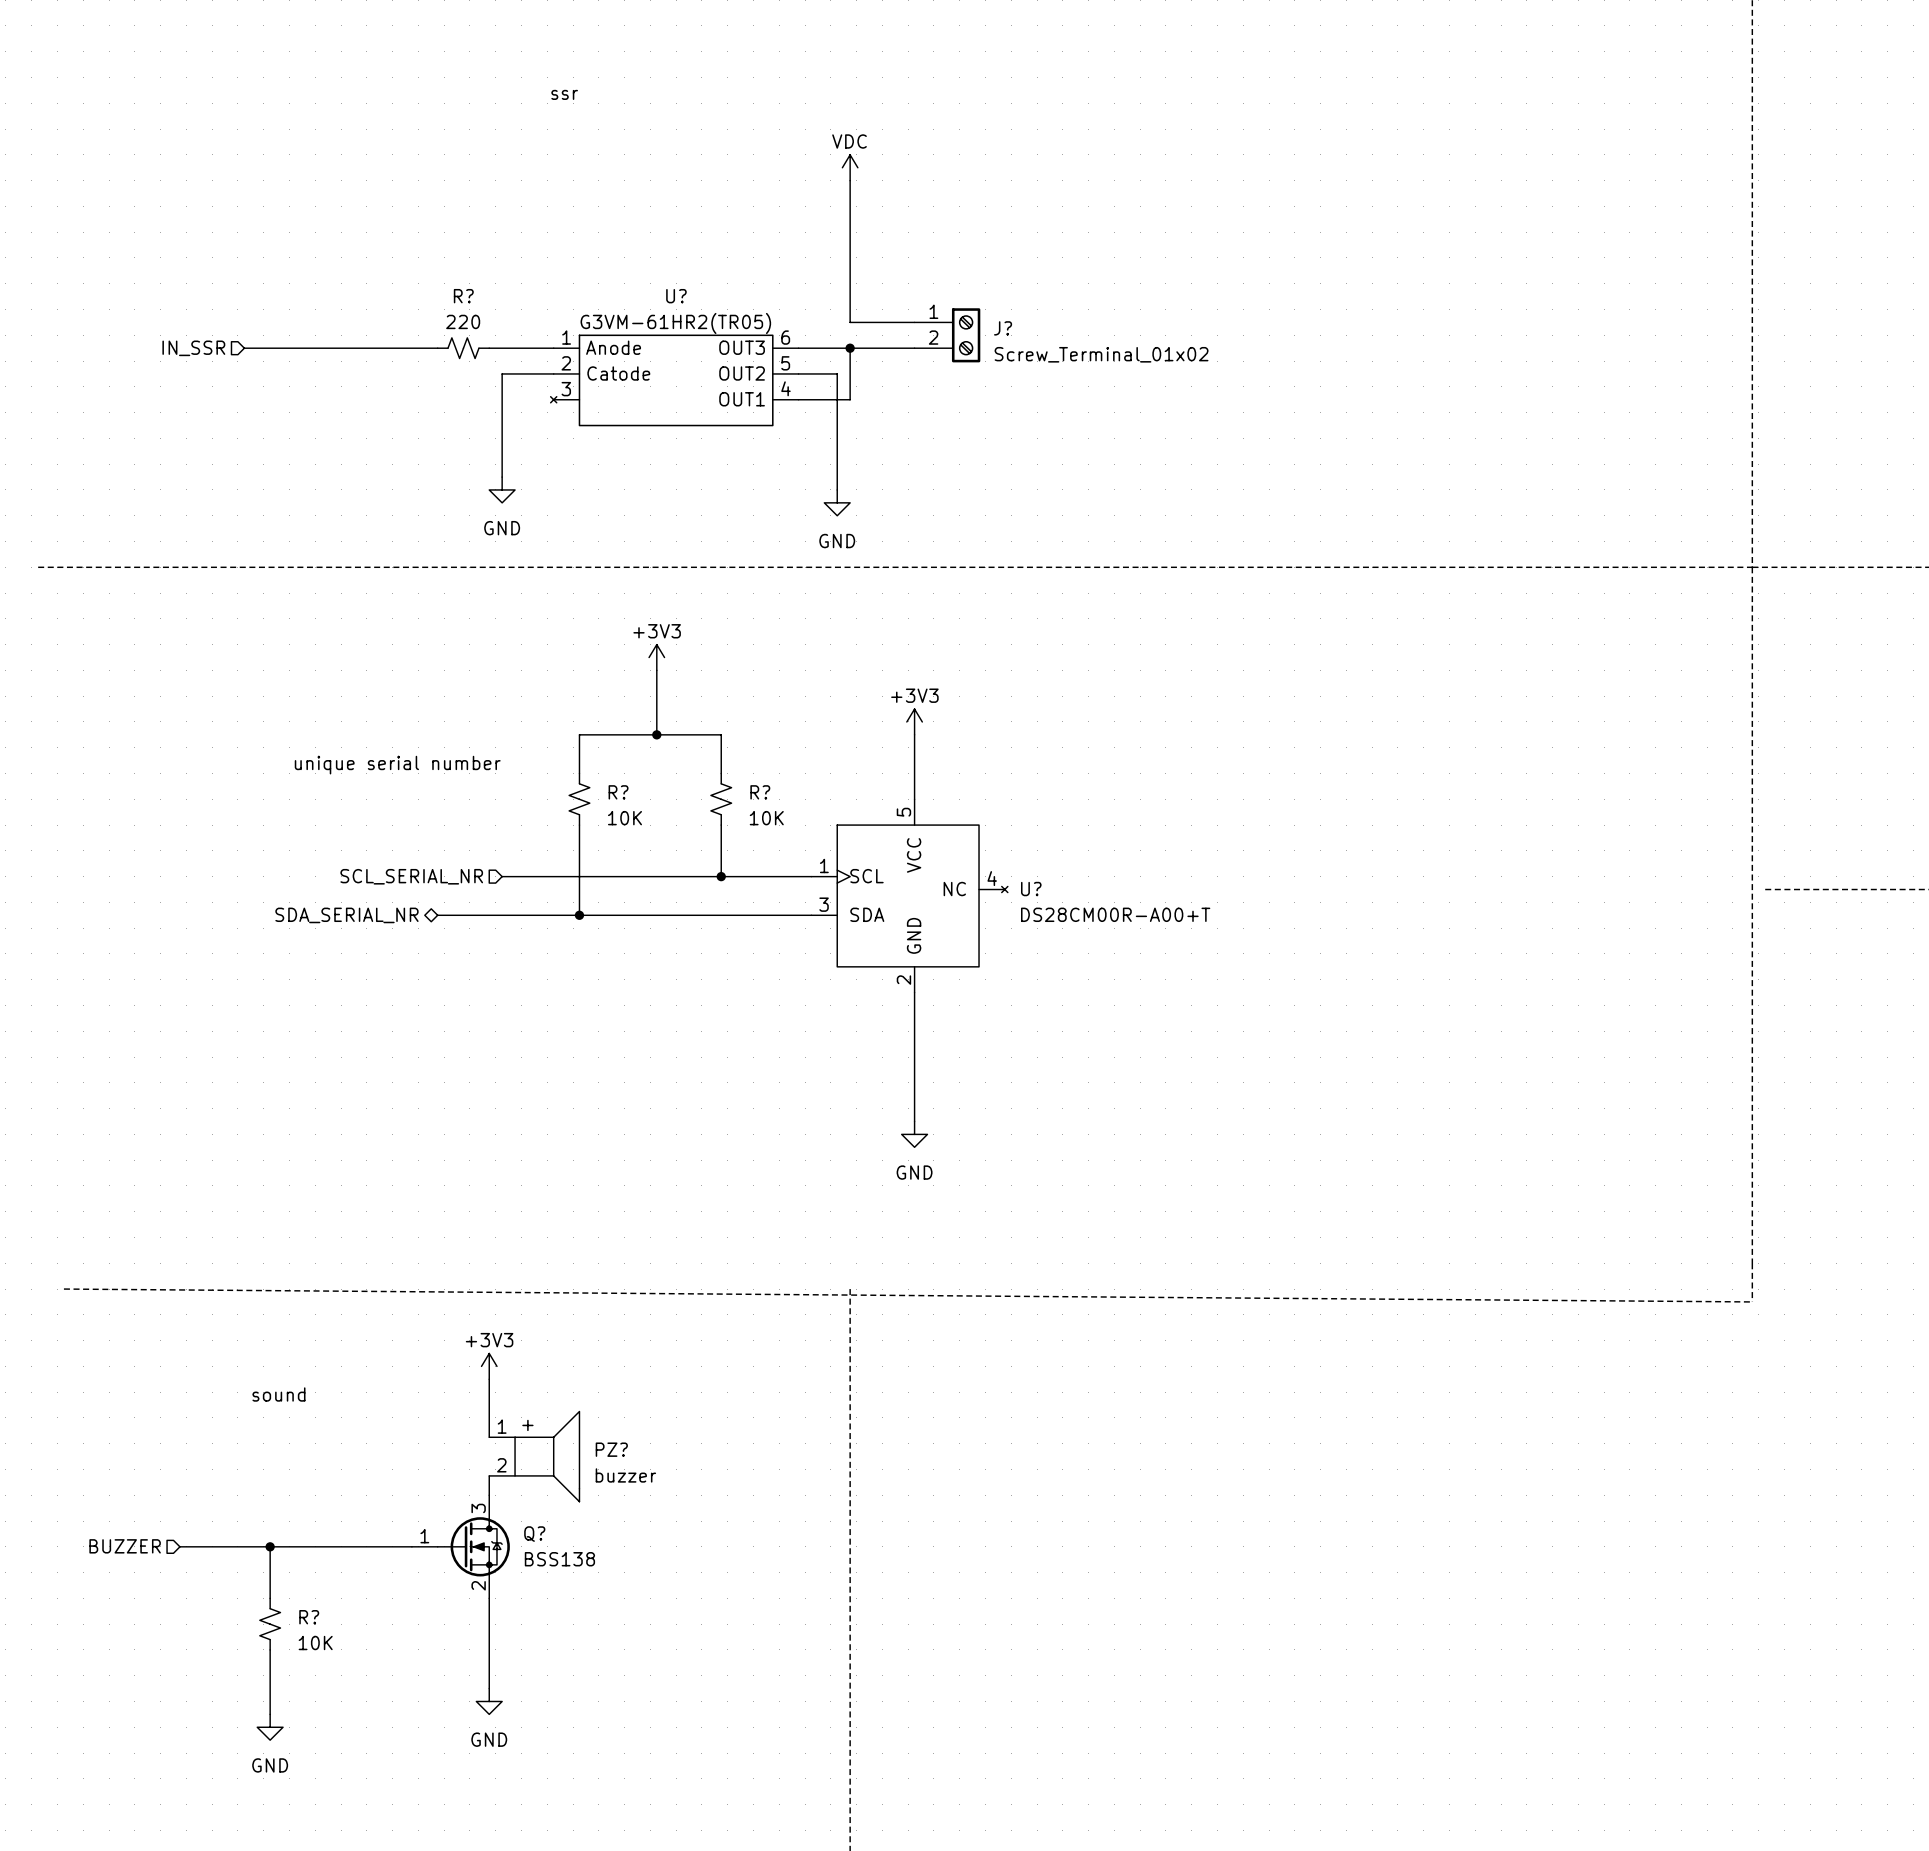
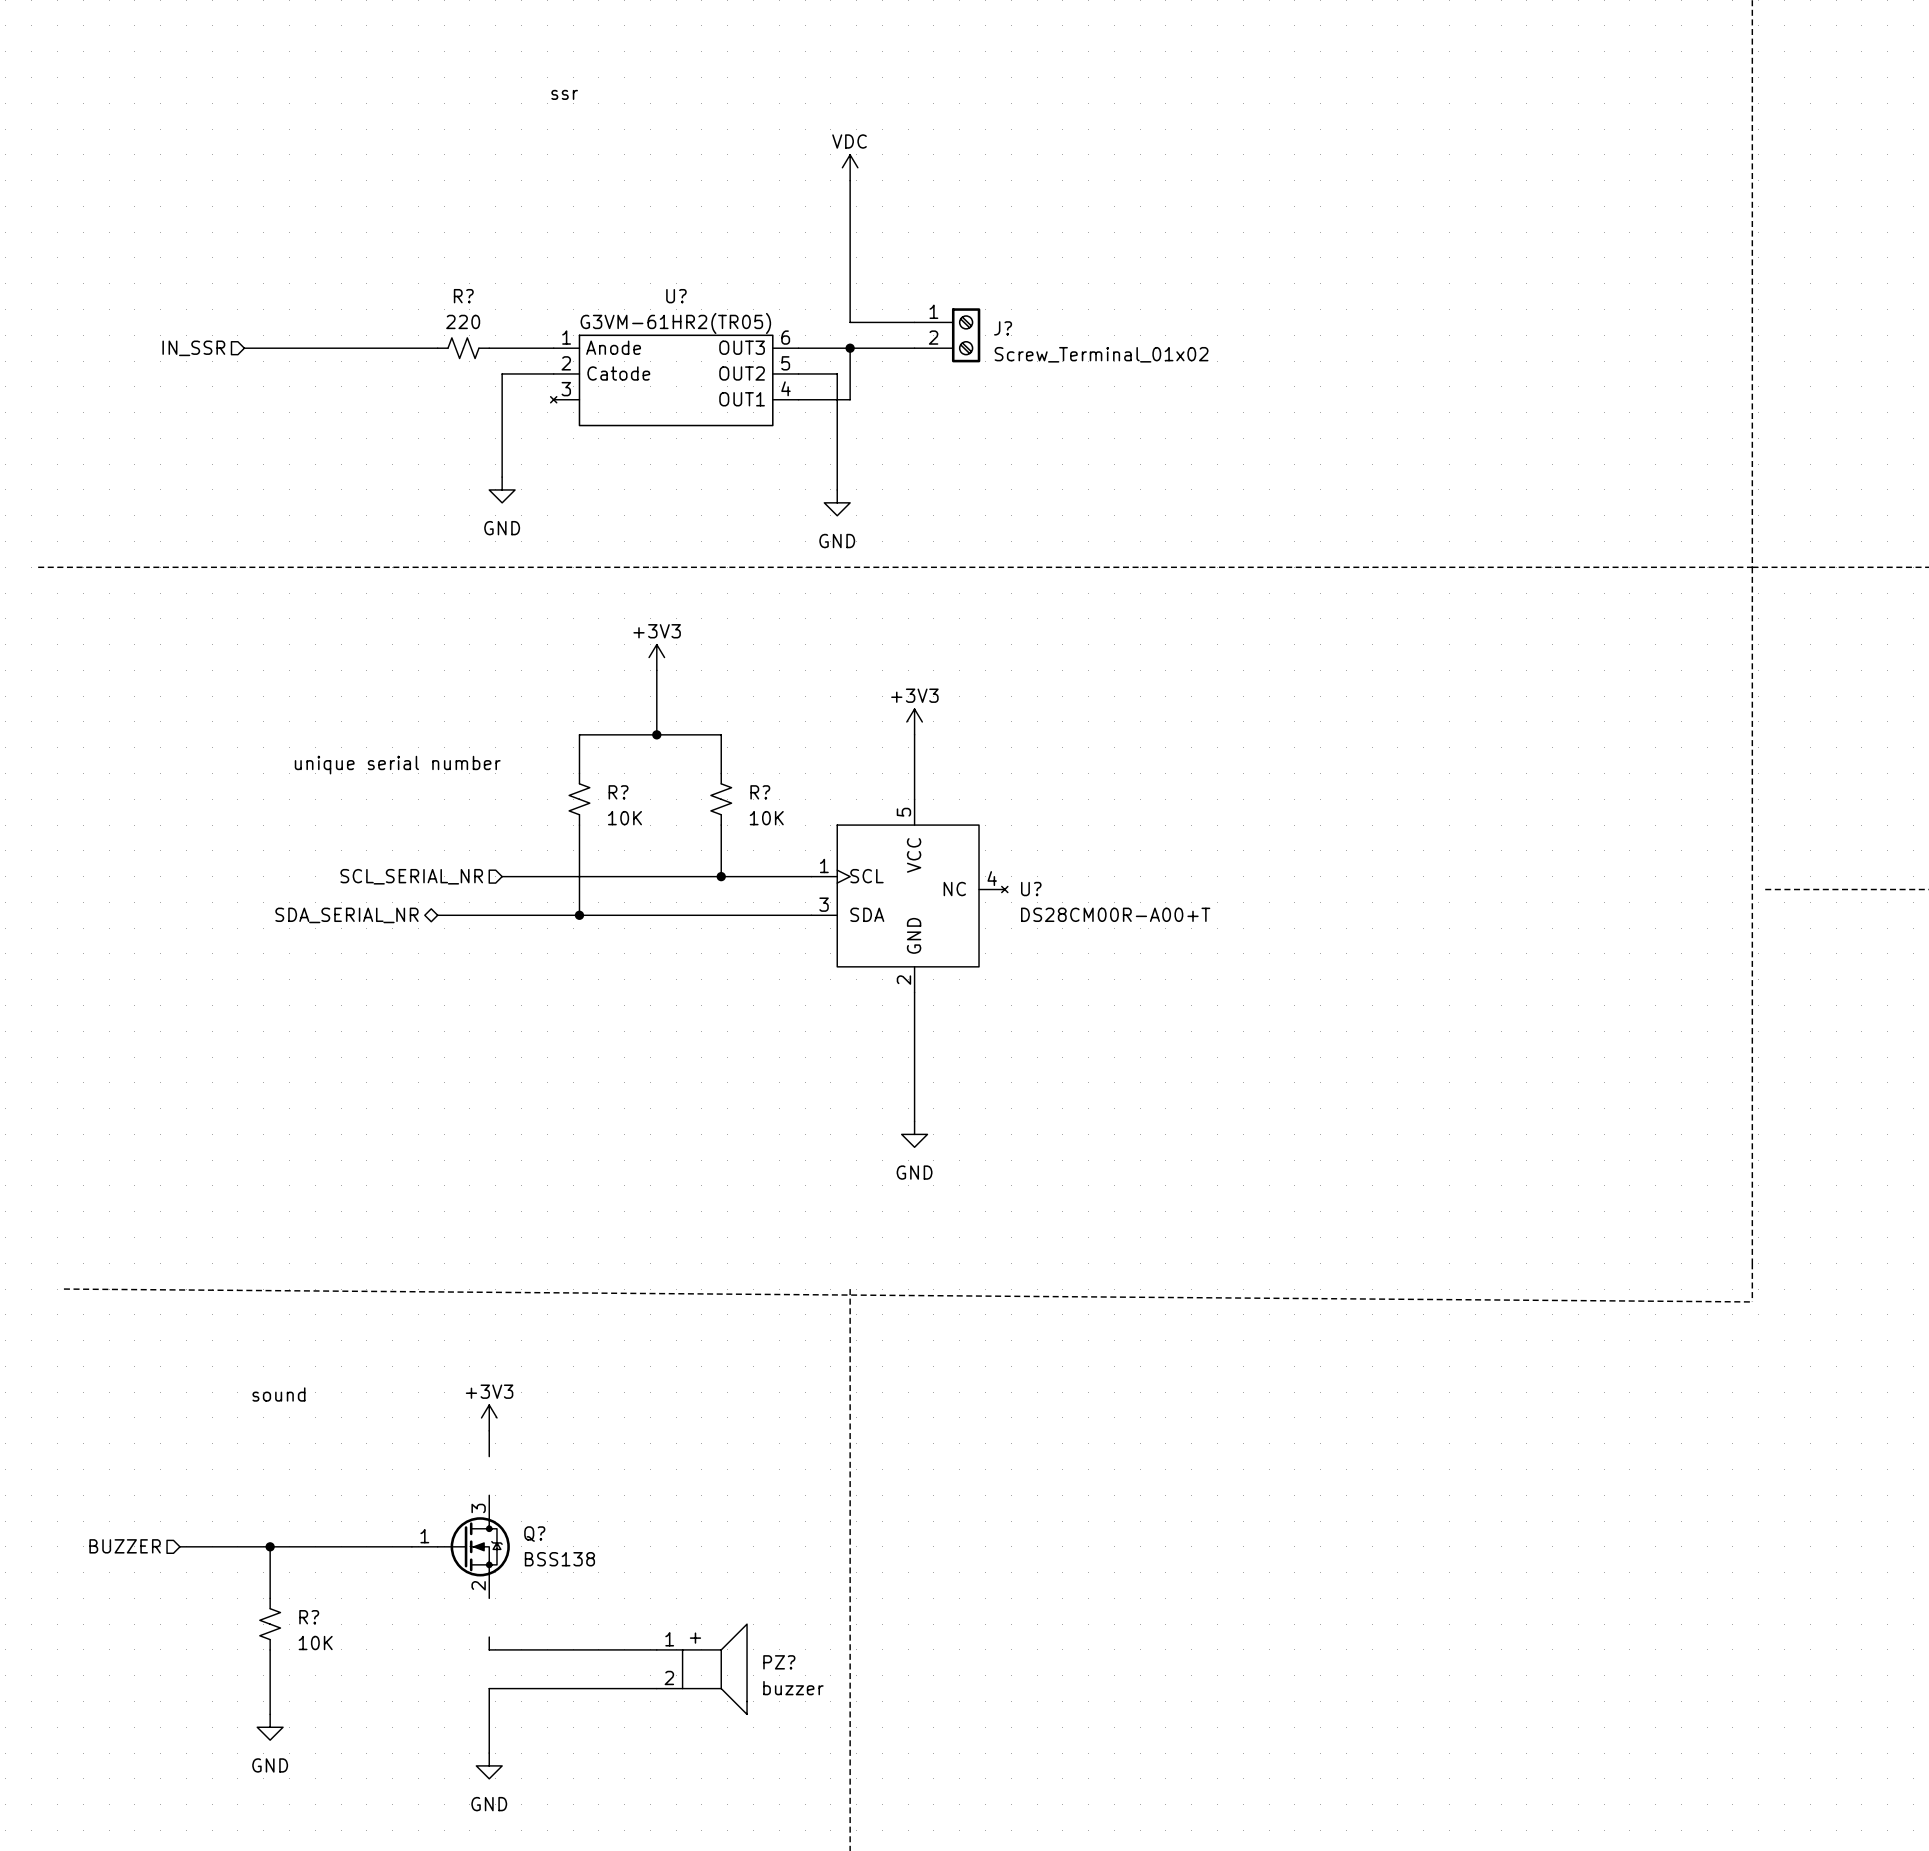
power symbol position: +3V3 (489, 1366) -> +3V3 (489, 1417)
PZ?: buzzer (534, 1456) -> none
wire: (489, 1475) (489, 1495) -> (489, 1437) (489, 1456)
wire: (489, 1598) (489, 1637) -> none
wire: (489, 1649) (489, 1688) -> (489, 1649) (656, 1649)
PZ?: none -> buzzer (701, 1669)
wire: none -> (656, 1688) (489, 1688) (489, 1753)
power symbol position: GND (489, 1701) -> GND (489, 1765)

